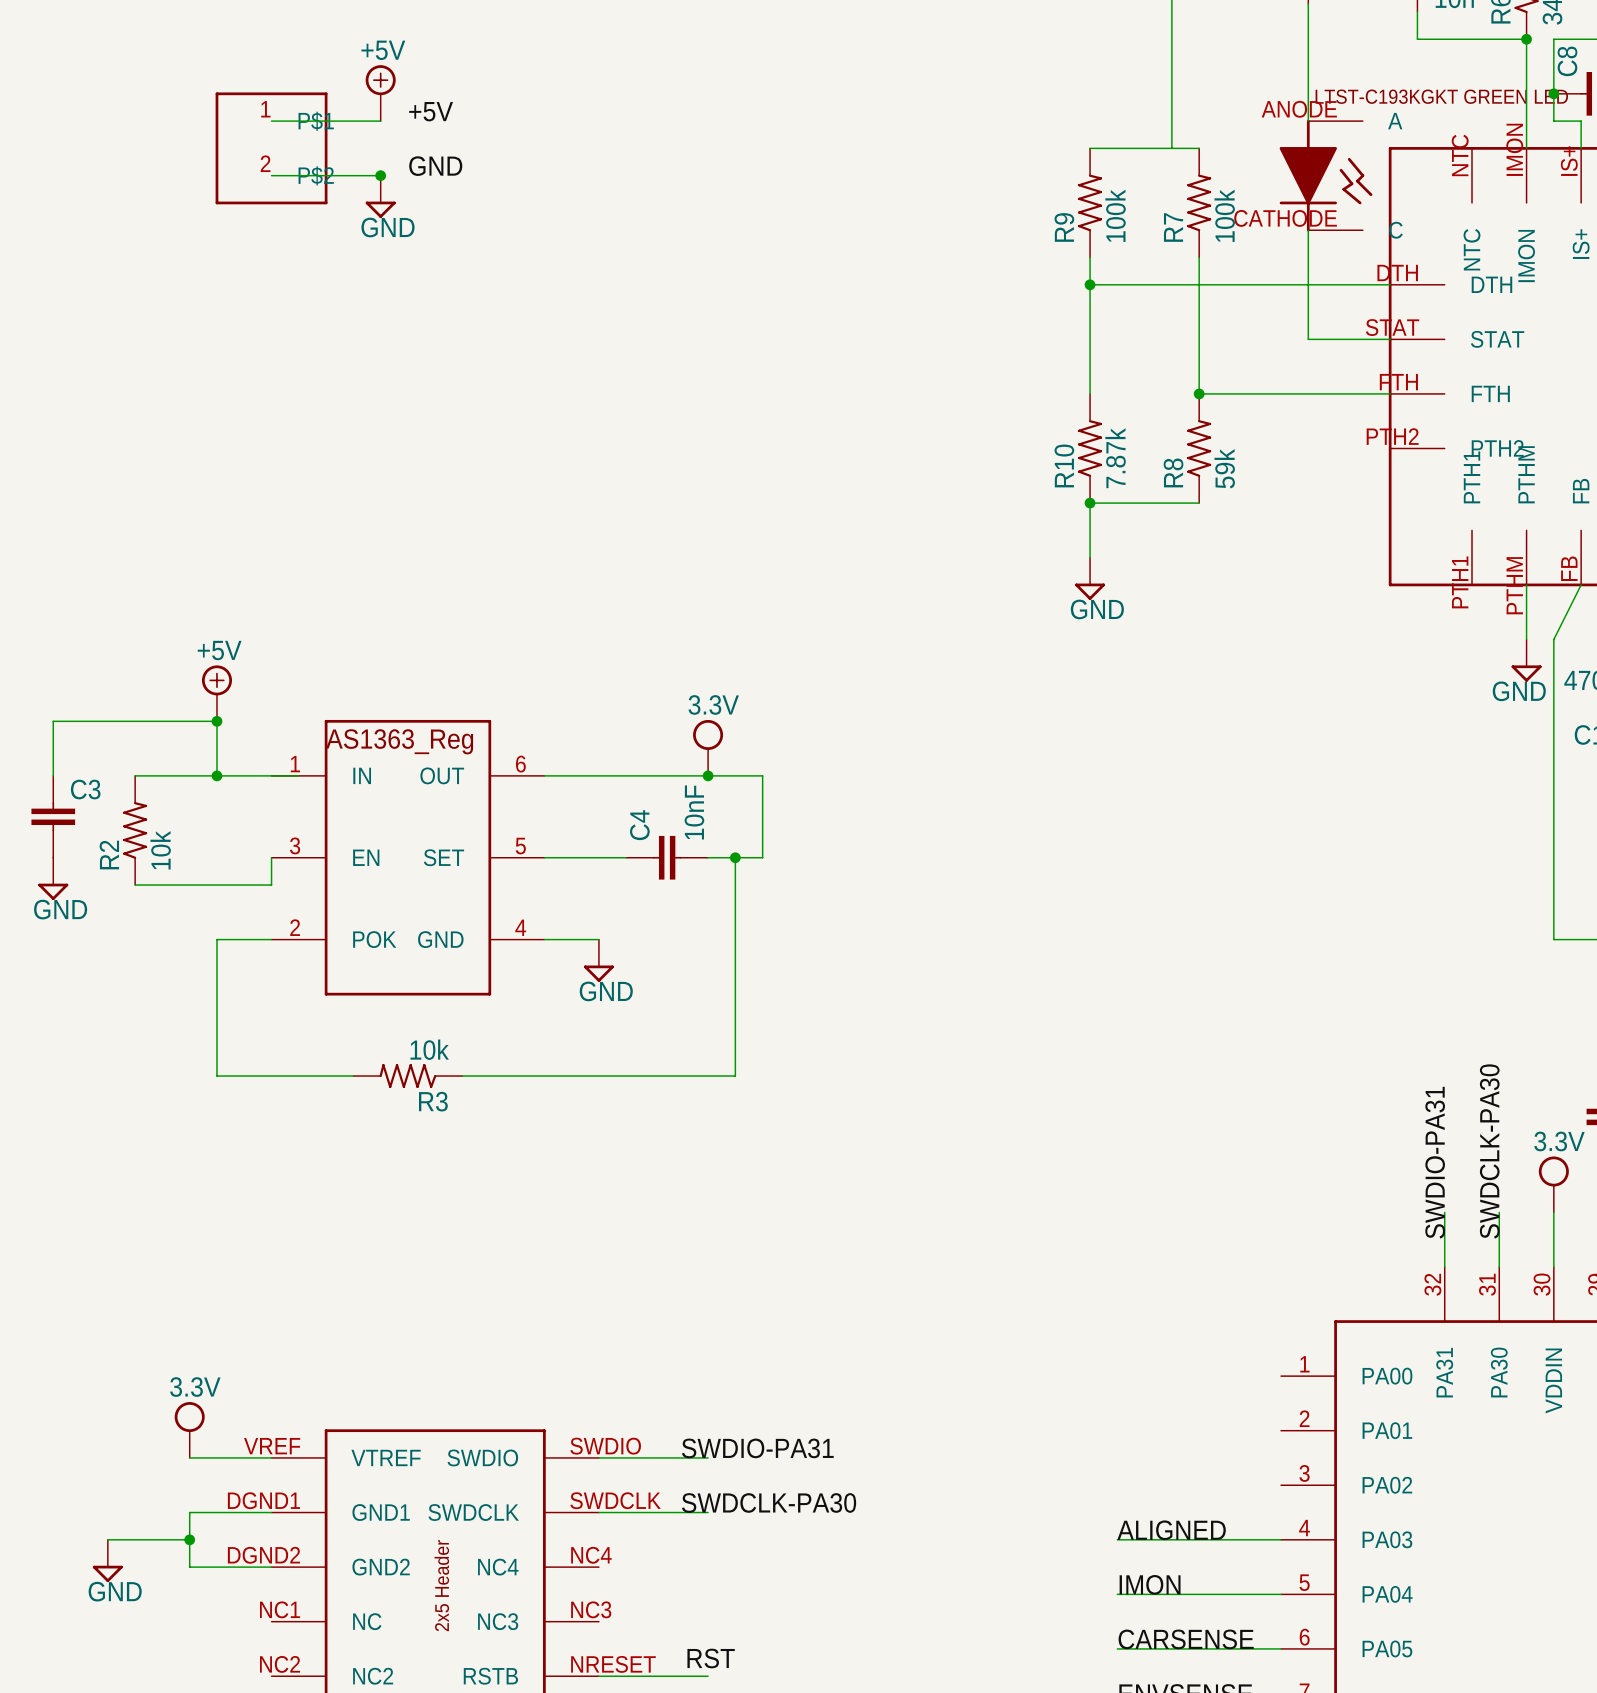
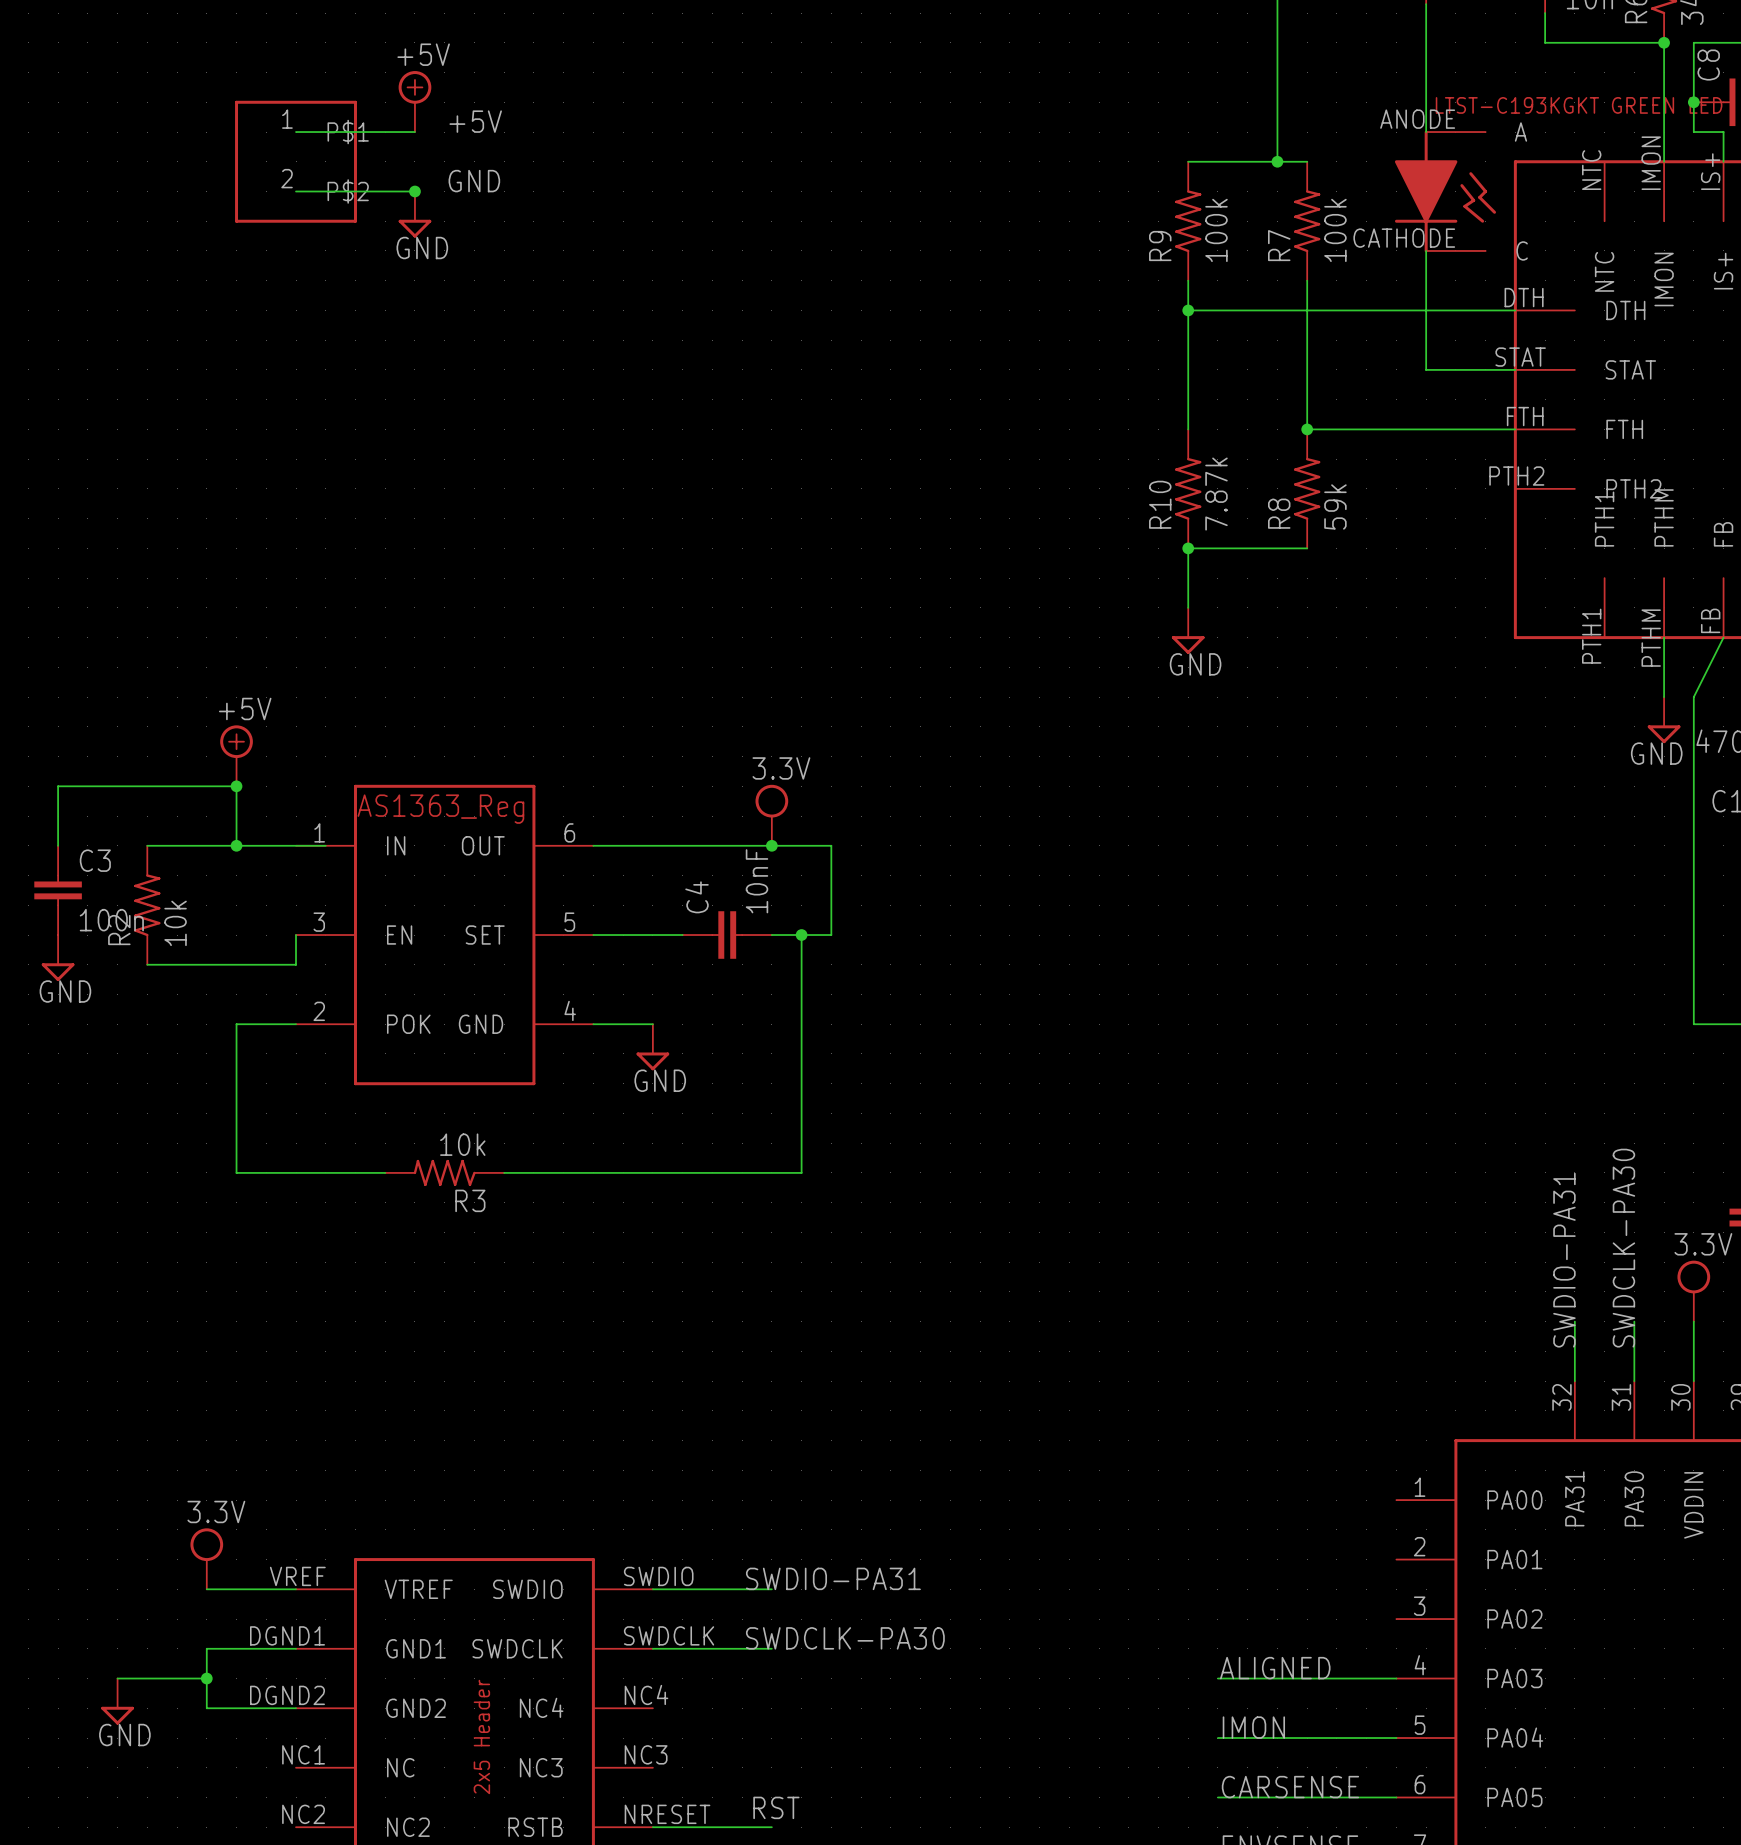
junction: none -> (1277, 161)
C3 value: none -> 100n (111, 920)

